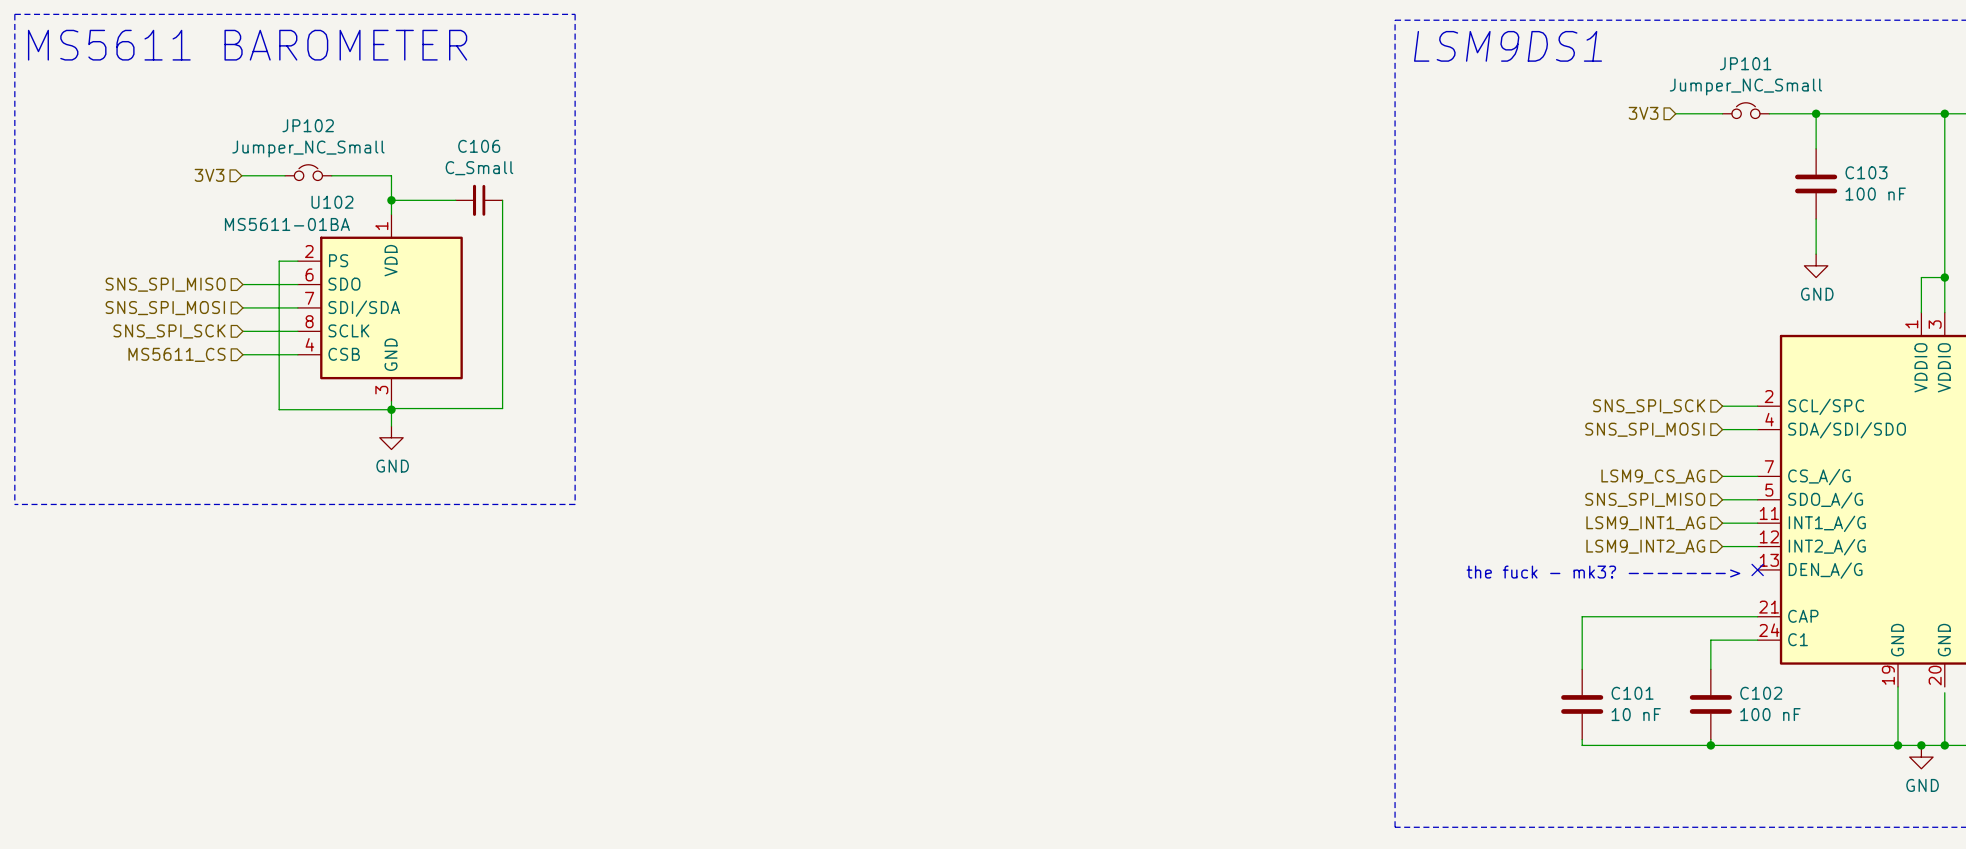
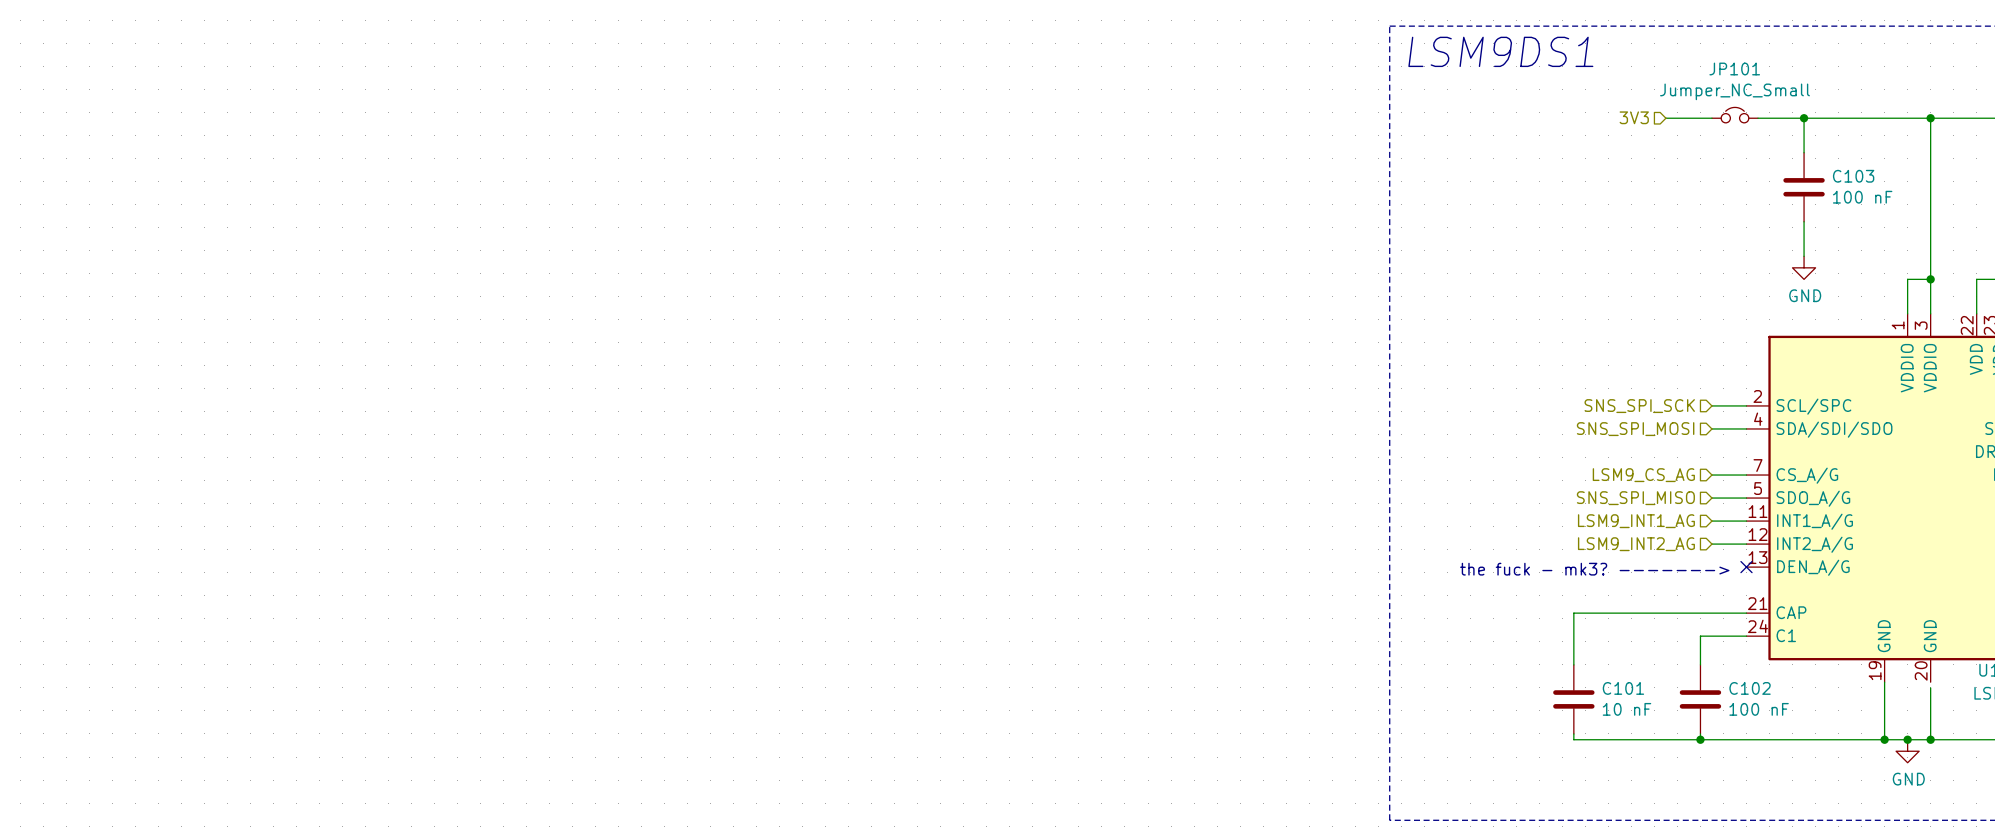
line: (14, 14) (14, 504) (575, 504) (575, 14) (14, 14) -> none
text: MS5611 BAROMETER (247, 45) -> none
JP102: Jumper_NC_Small (308, 172) -> none
hierarchical label: 3V3 (209, 175) -> none
wire: (241, 175) (285, 175) -> none
wire: (331, 175) (391, 175) (391, 214) -> none
wire: (391, 200) (455, 200) -> none
junction: (391, 200) -> none
C106: C_Small (479, 200) -> none
wire: (502, 200) (502, 408) (391, 408) -> none
wire: (297, 261) (279, 261) (279, 409) (391, 409) -> none
hierarchical label: SNS_SPI_MISO (165, 284) -> none
wire: (242, 284) (297, 284) -> none
wire: (242, 307) (297, 307) -> none
U102: MS5611-01BA (380, 307) -> none
hierarchical label: SNS_SPI_MOSI (165, 308) -> none
hierarchical label: SNS_SPI_SCK (169, 331) -> none
wire: (242, 331) (297, 331) -> none
hierarchical label: MS5611_CS (177, 354) -> none
wire: (242, 354) (297, 354) -> none
wire: (391, 401) (391, 426) -> none
junction: (391, 409) -> none
power symbol: GND (391, 437) -> none

